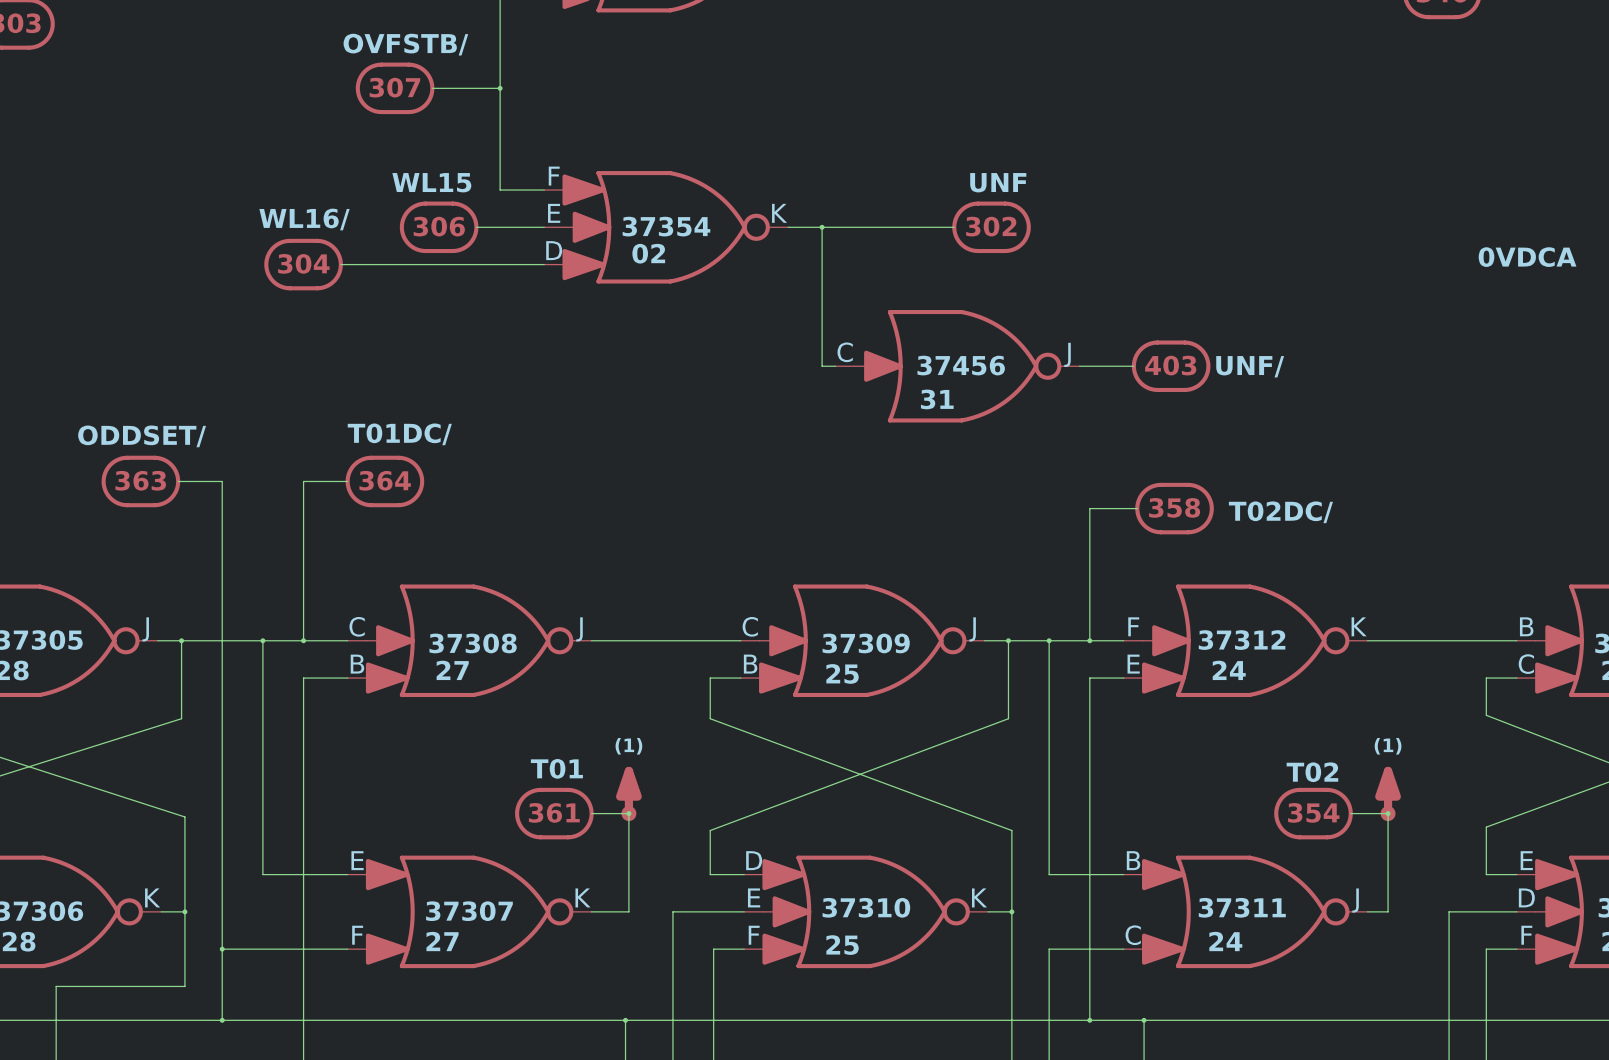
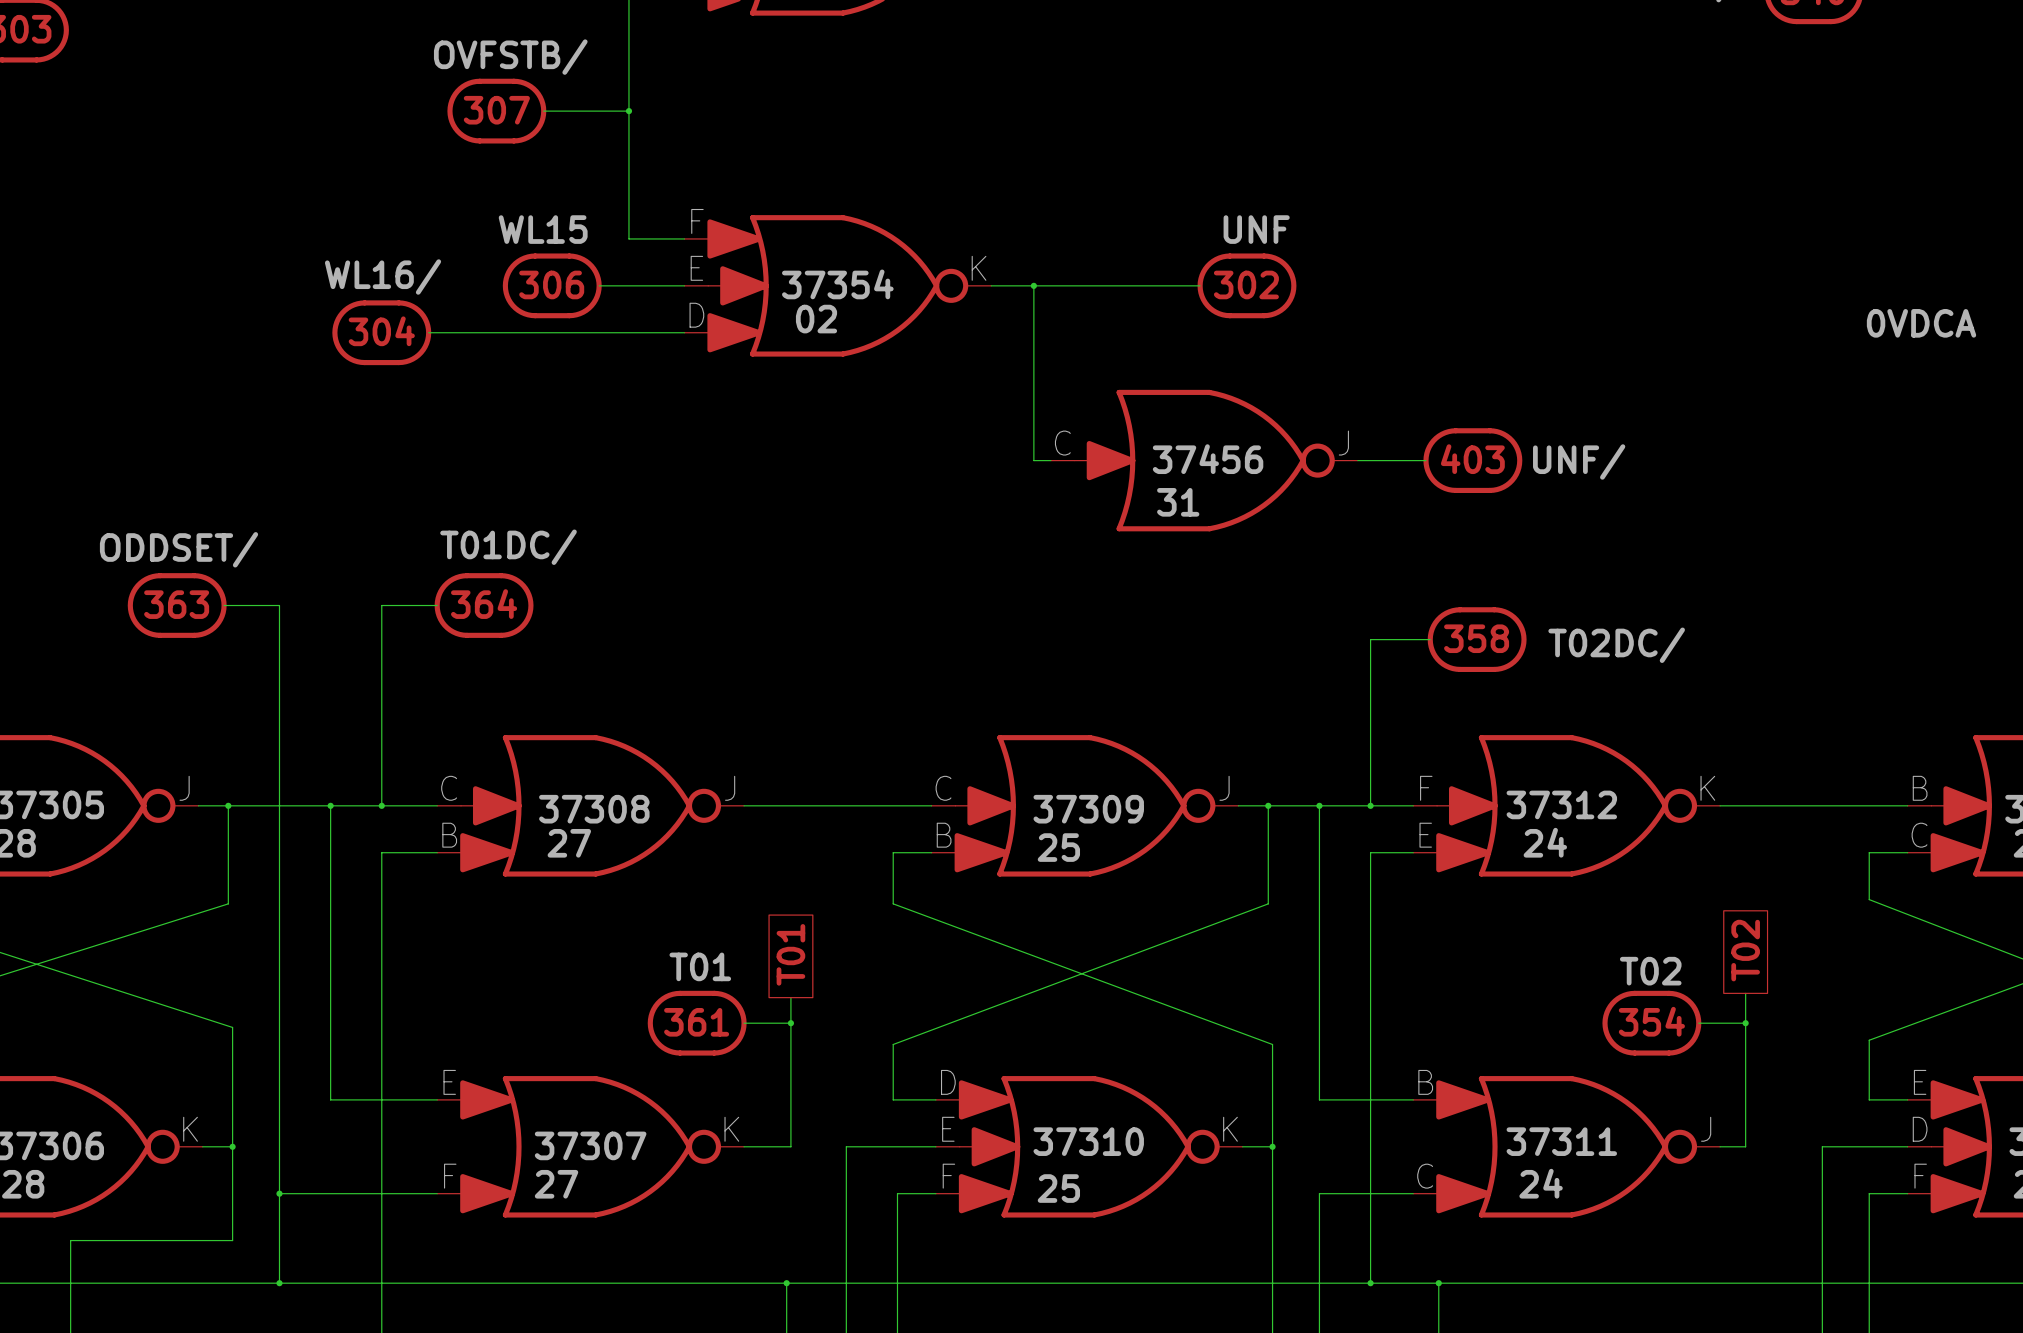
global label: none -> T02 (1745, 950)
global label: none -> T01 (790, 954)
part: (628, 793) -> none
part: (1388, 793) -> none

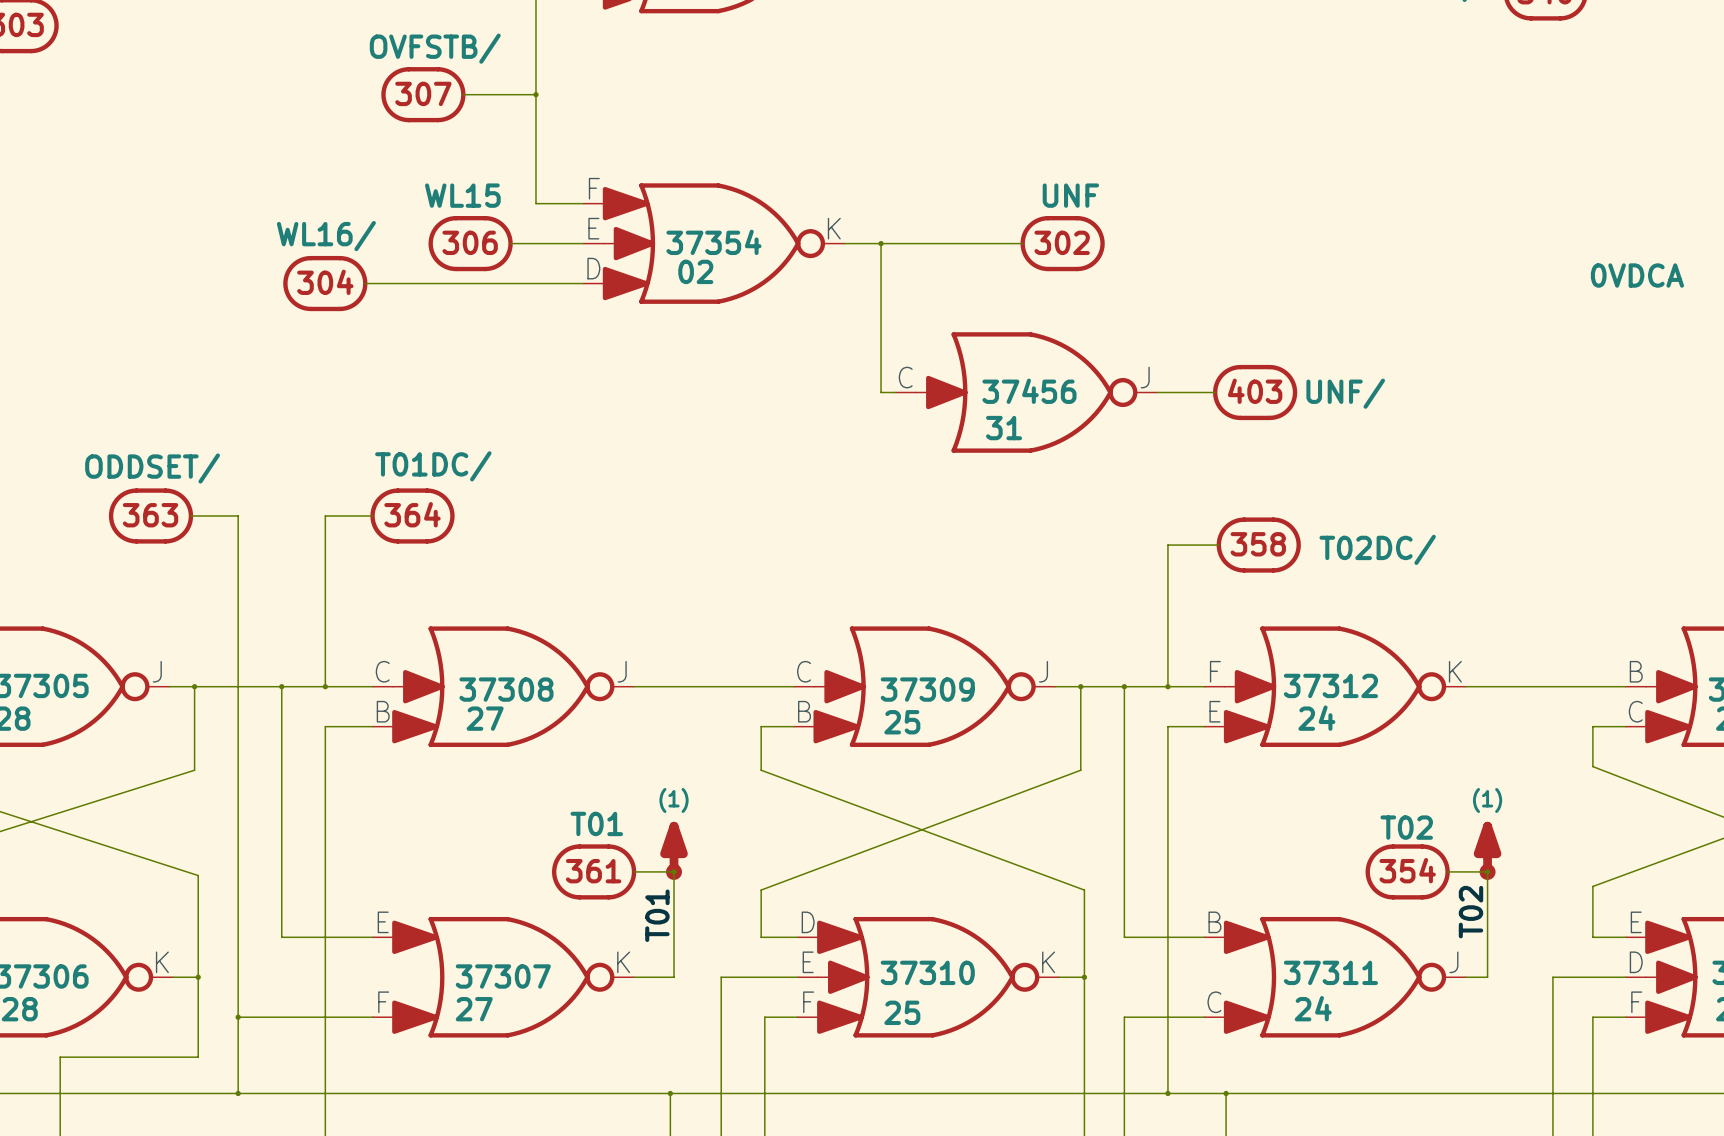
global label: T02 (1745, 950) -> none
global label: T01 (790, 954) -> none
part: none -> (674, 850)
part: none -> (1487, 850)
label: none -> T02 (1470, 912)
label: none -> T01 (657, 915)

